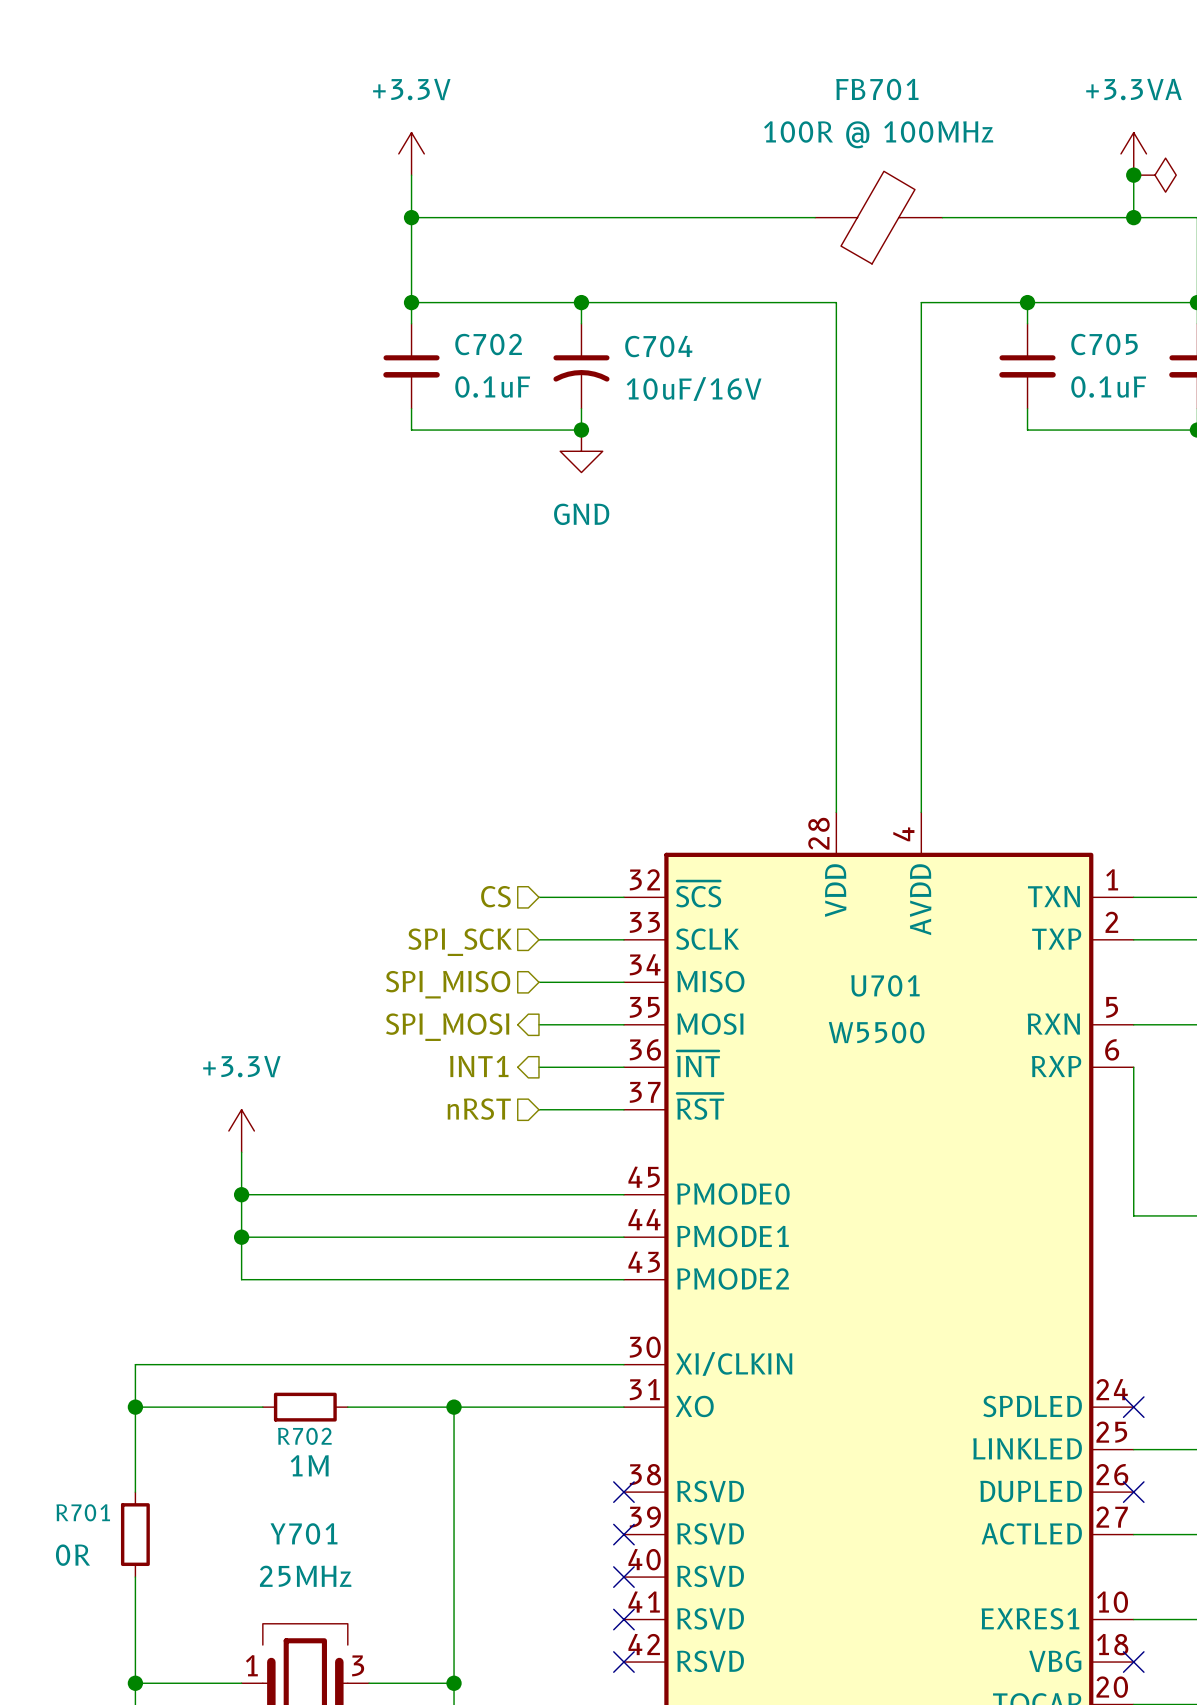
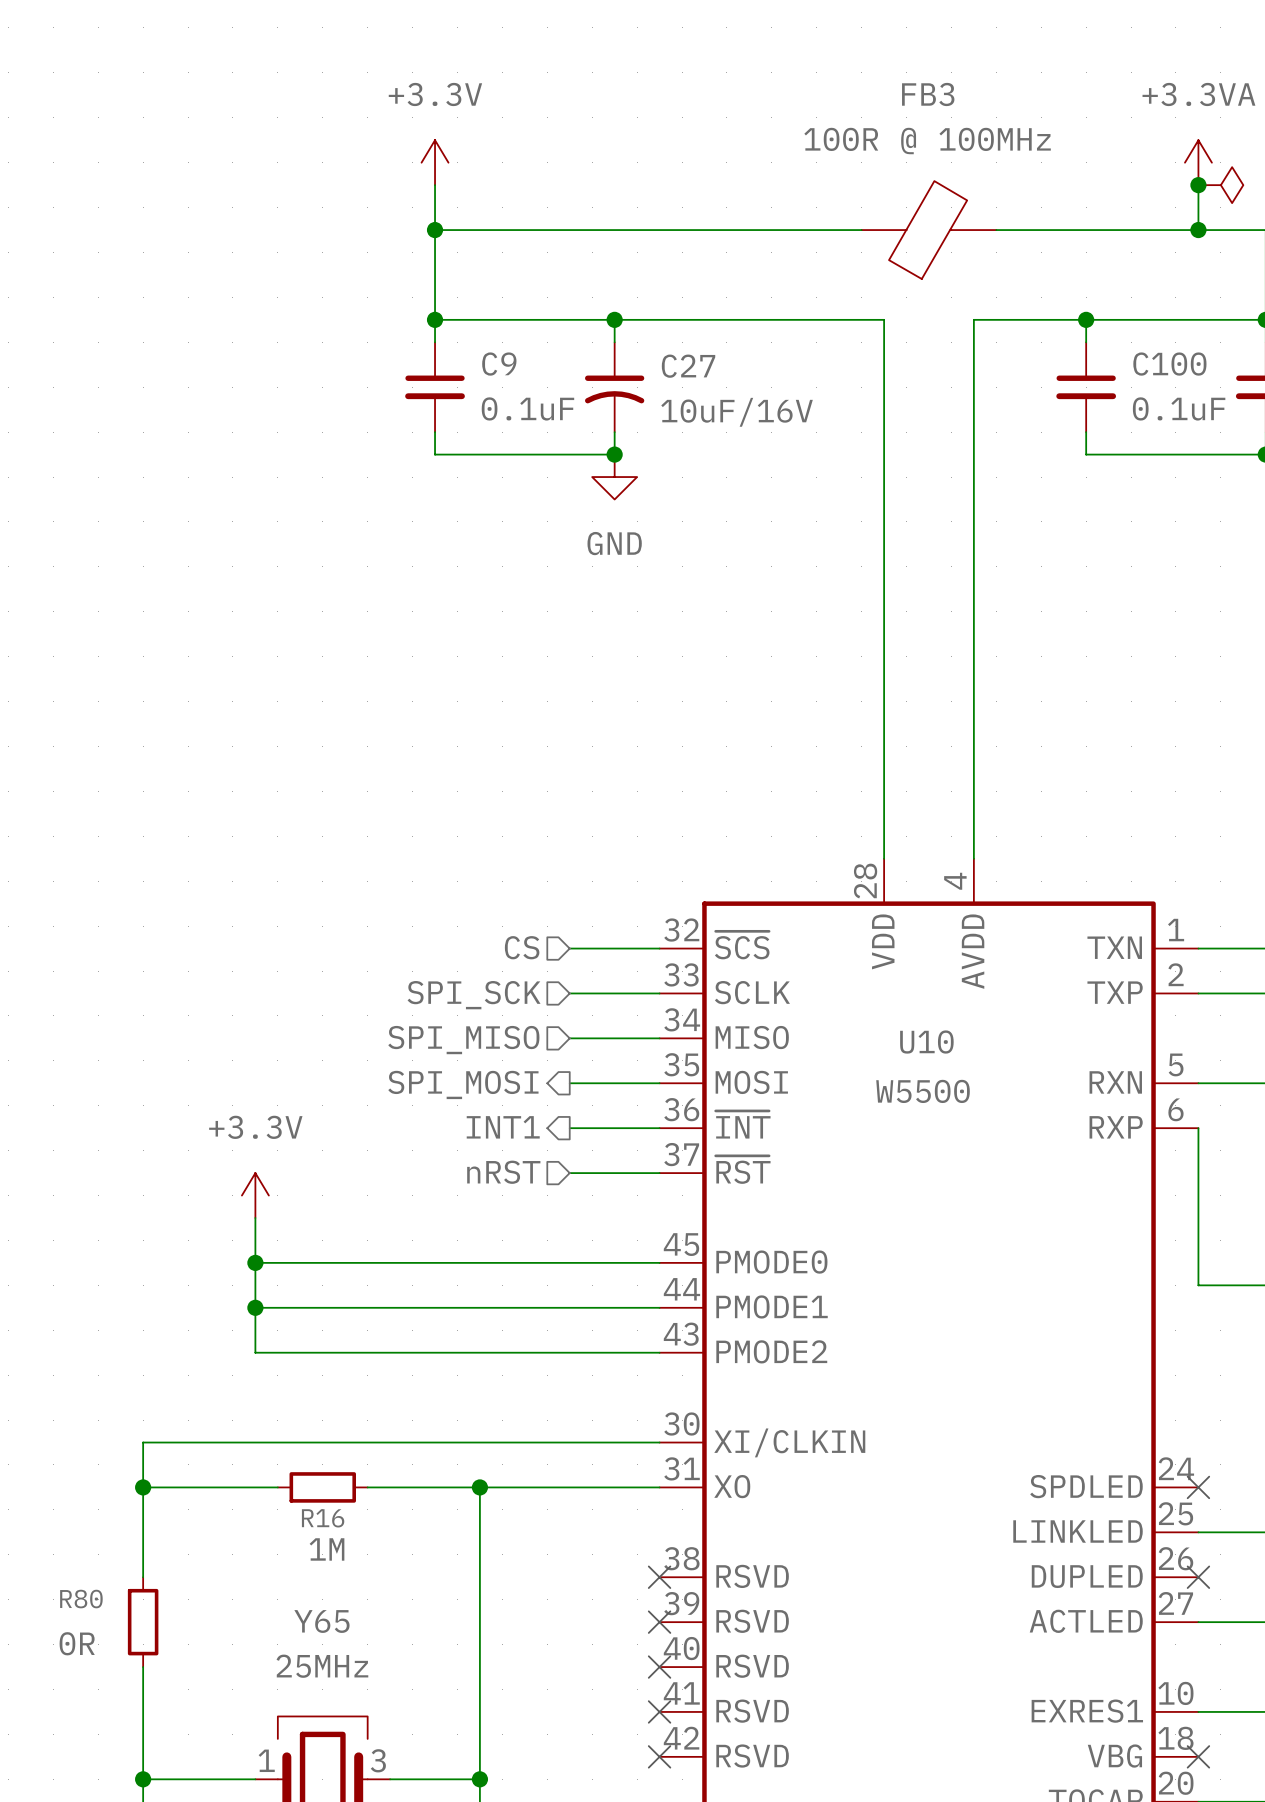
FB701 name: FB701 (877, 89) -> FB3 (928, 94)
C702 name: C702 (488, 344) -> C9 (499, 364)
C705 name: C705 (1104, 344) -> C100 (1169, 364)
C704 name: C704 (658, 346) -> C27 (688, 366)
U701 name: U701 (885, 985) -> U10 (926, 1042)
R702 name: R702 (304, 1436) -> R16 (323, 1518)
R701 name: R701 (83, 1512) -> R80 (81, 1599)
Y701 name: Y701 (304, 1533) -> Y65 (321, 1621)

